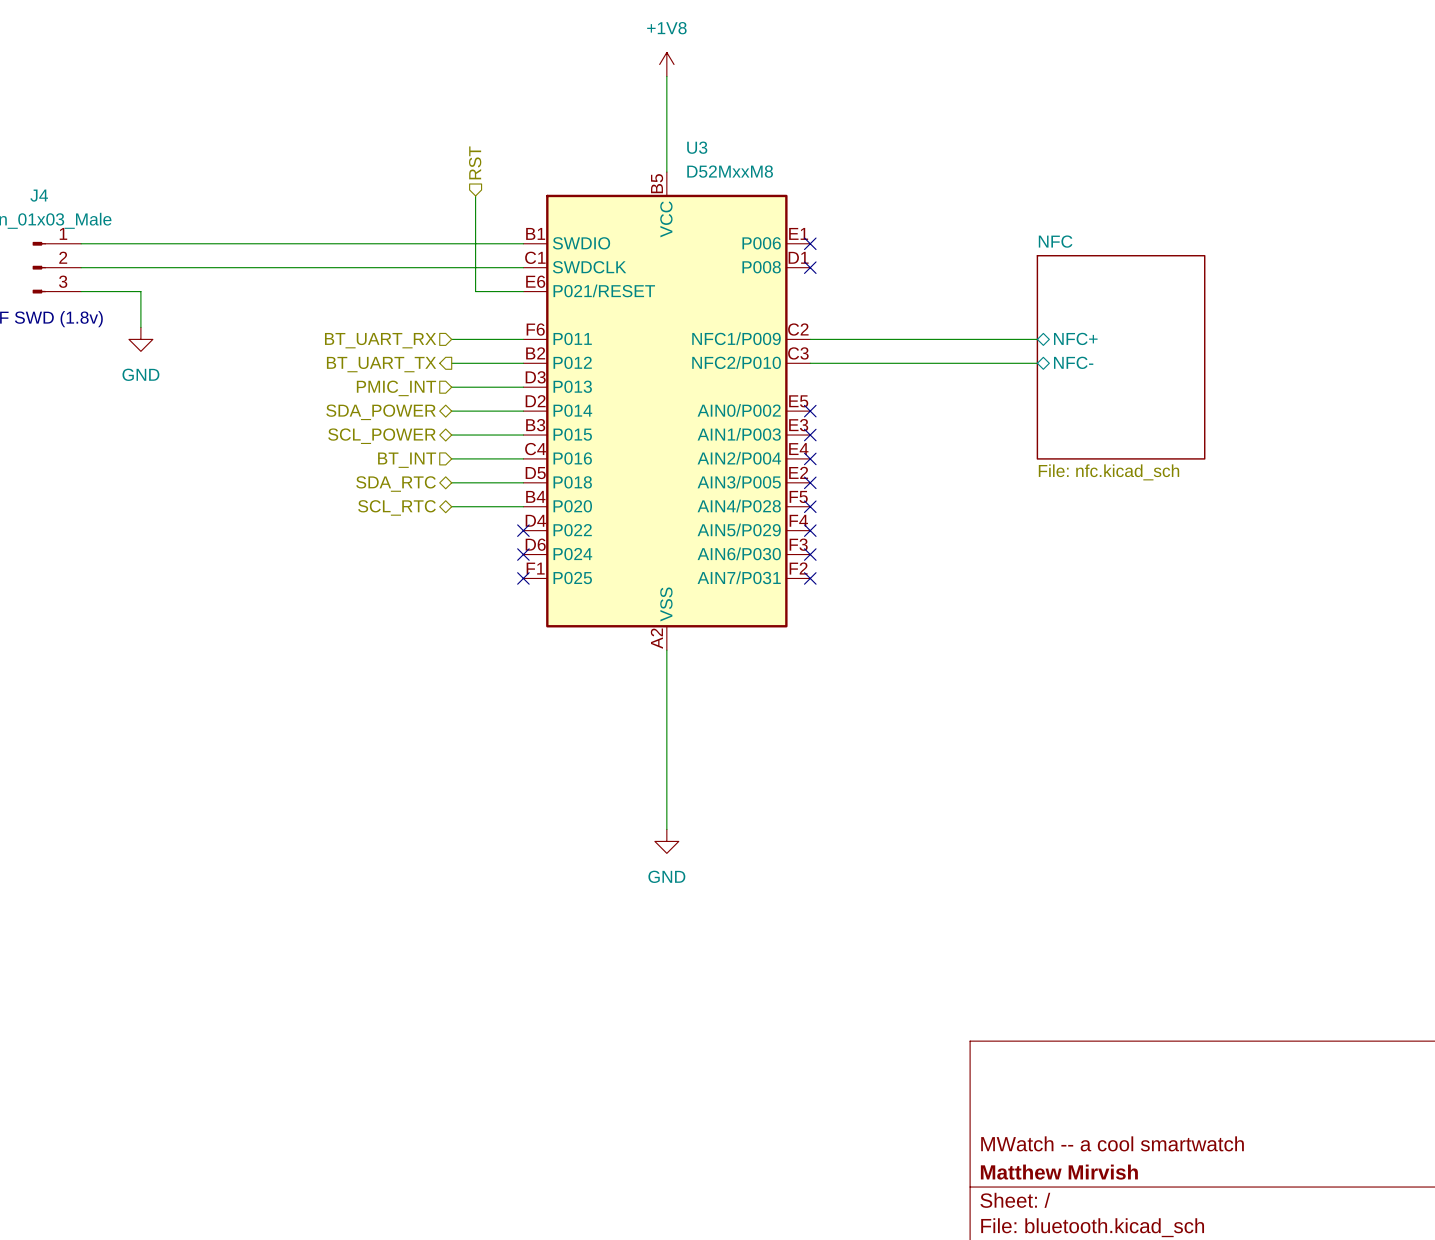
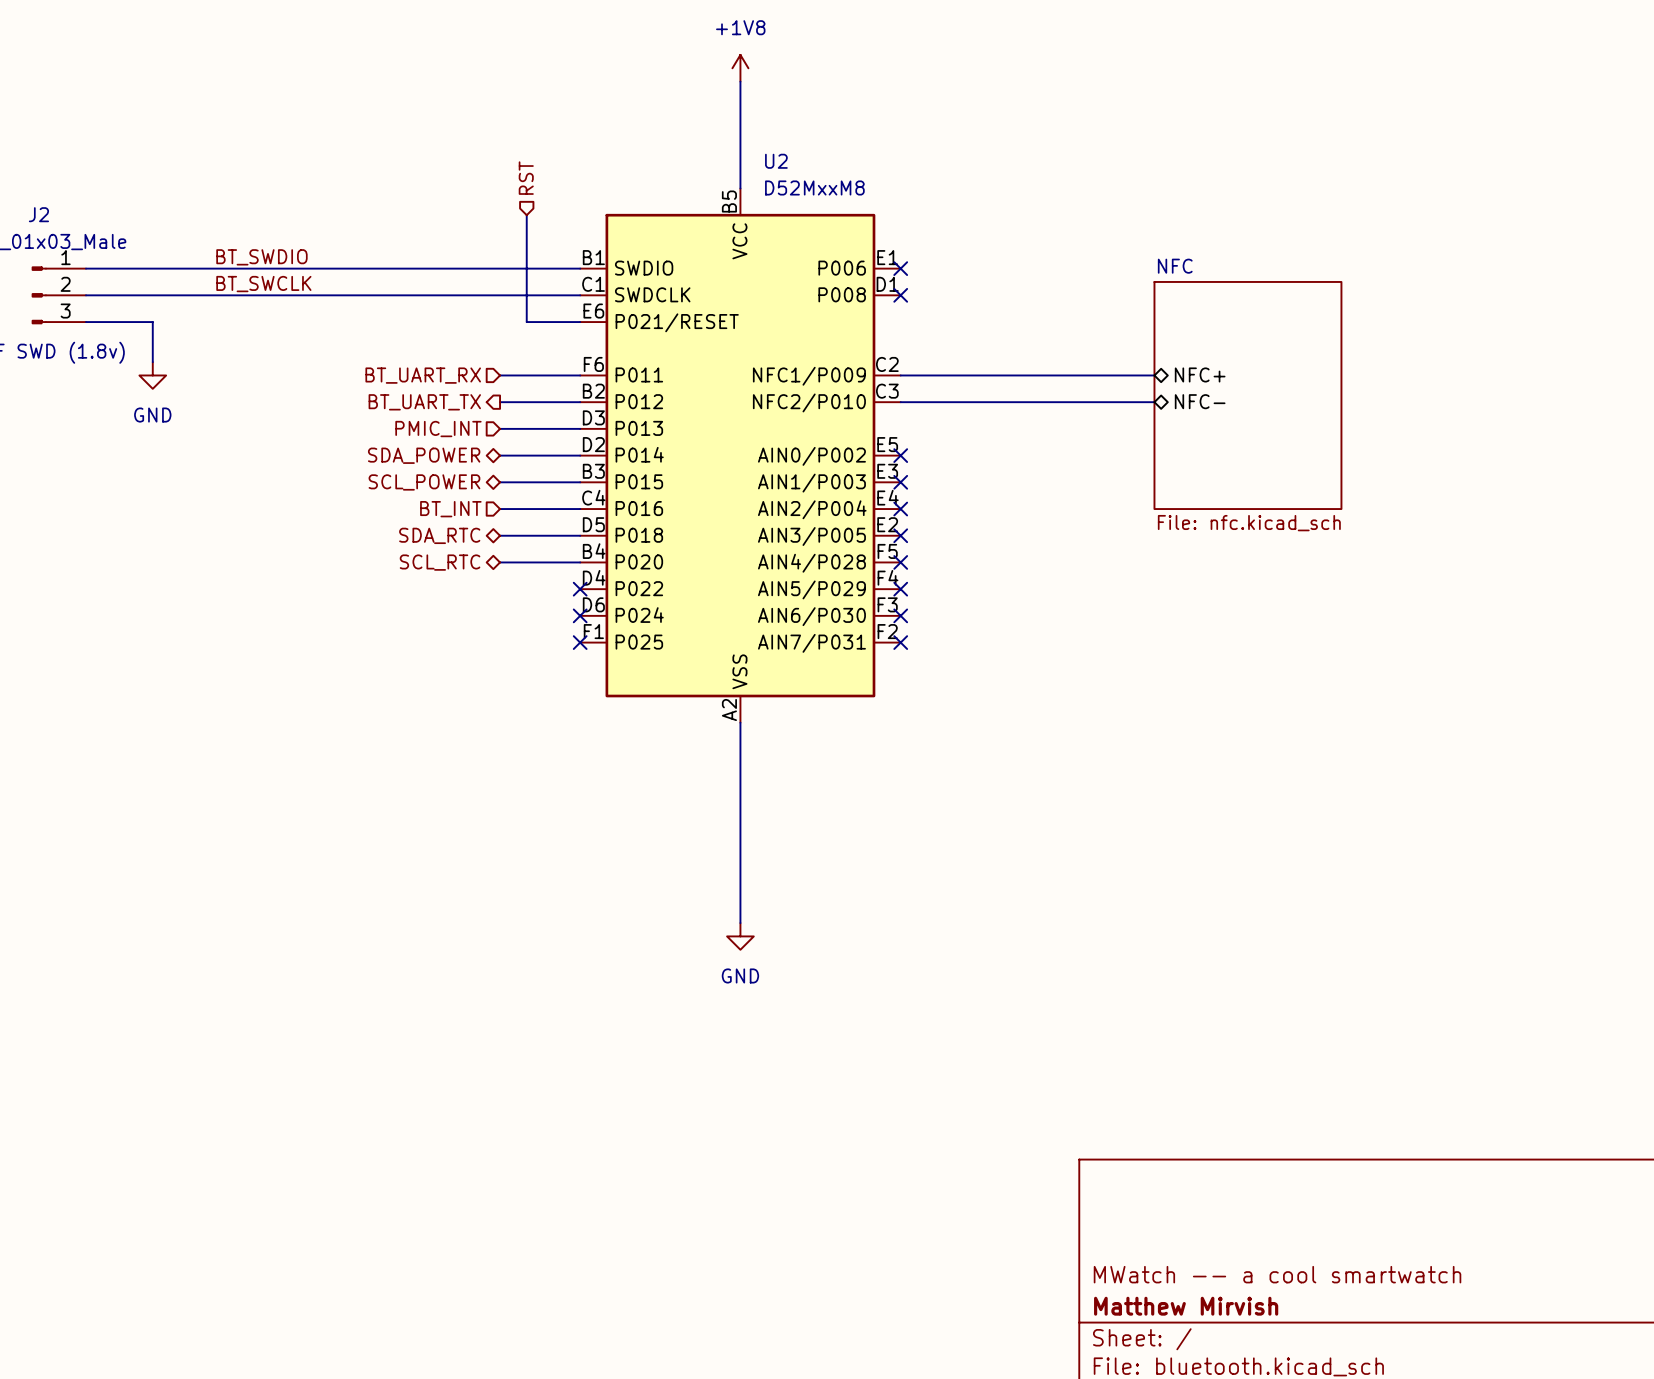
U3 name: U3 (697, 147) -> U2 (776, 161)
J4 name: J4 (39, 195) -> J2 (38, 214)
label: none -> BT_SWDIO (261, 257)
label: none -> BT_SWCLK (263, 284)

